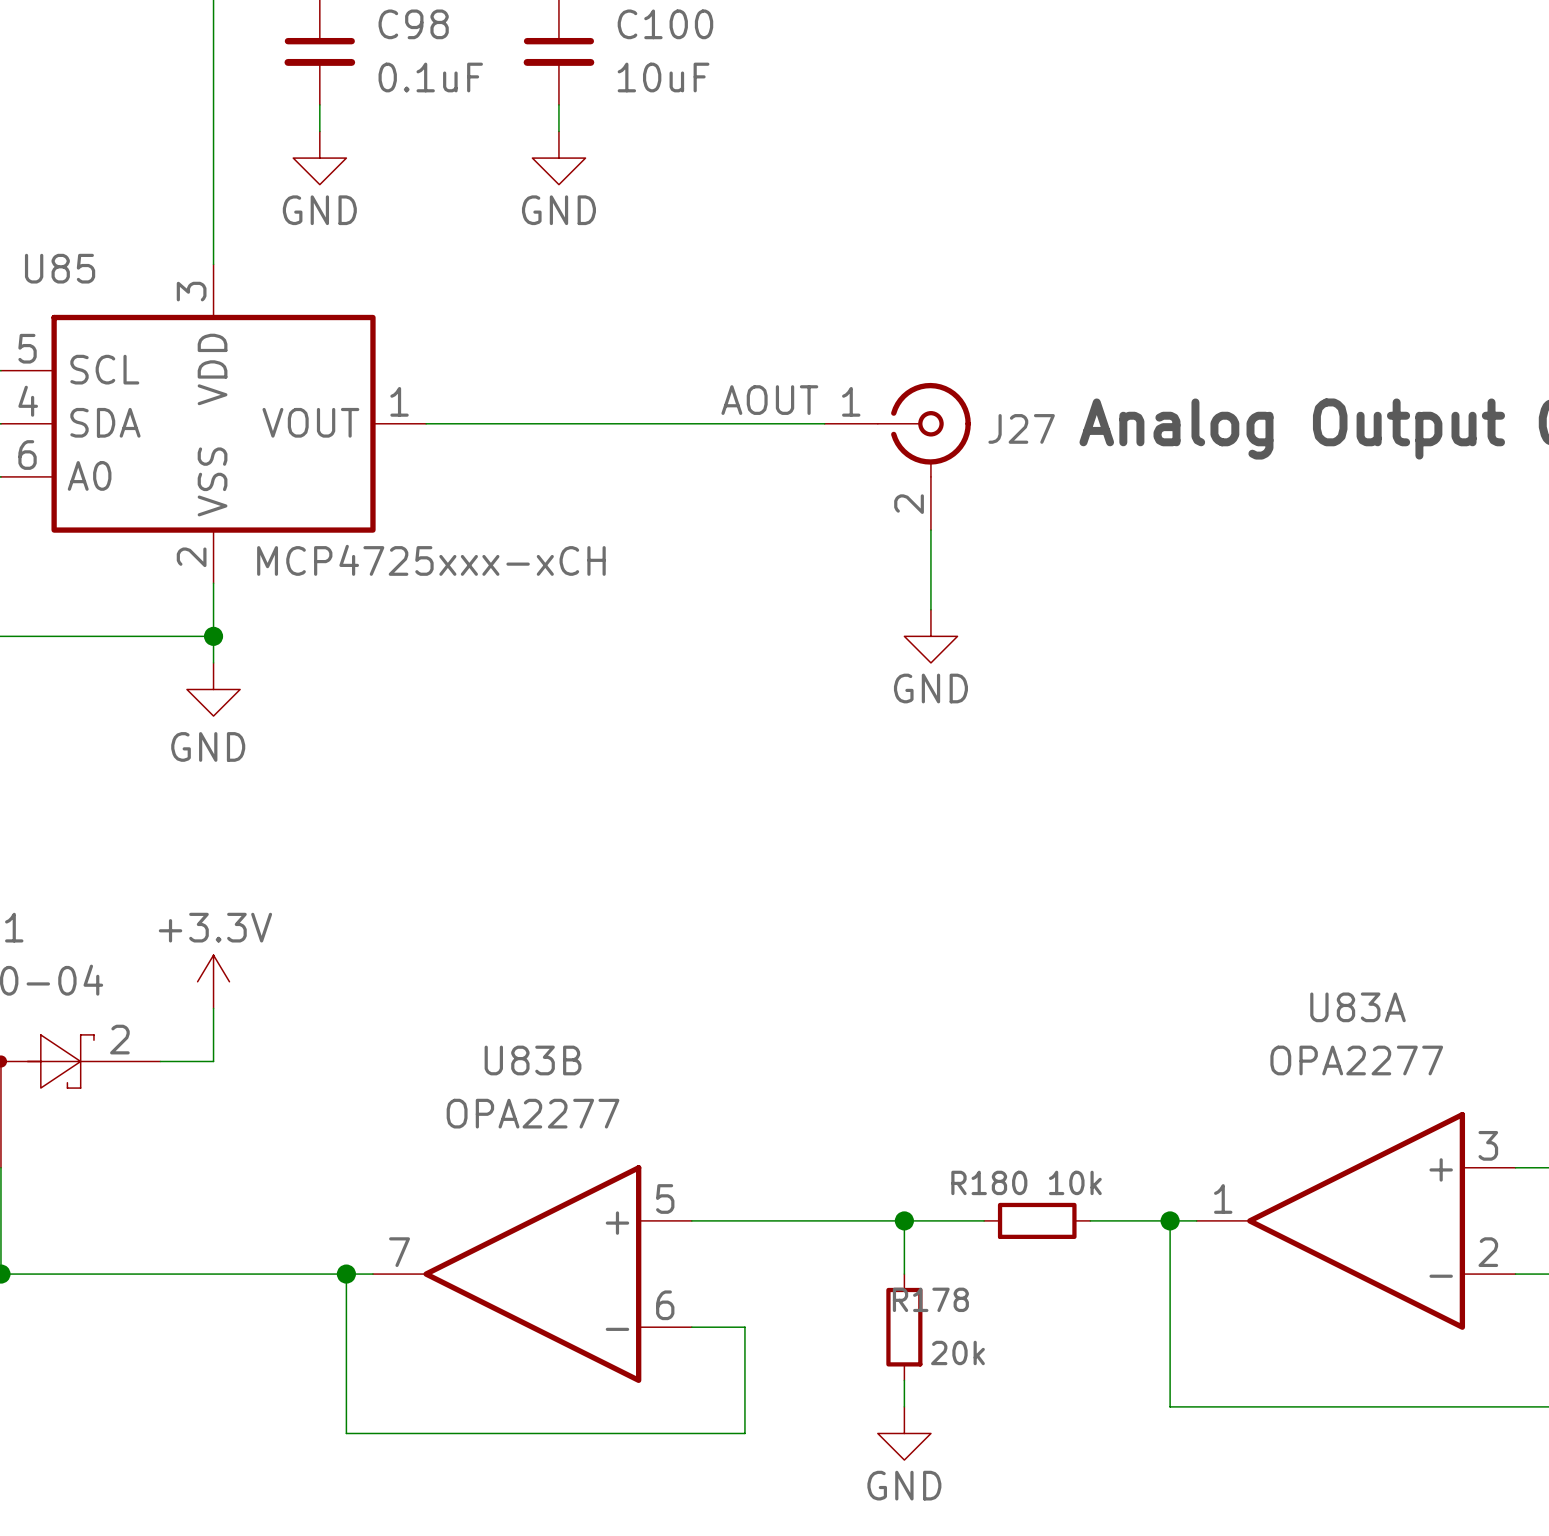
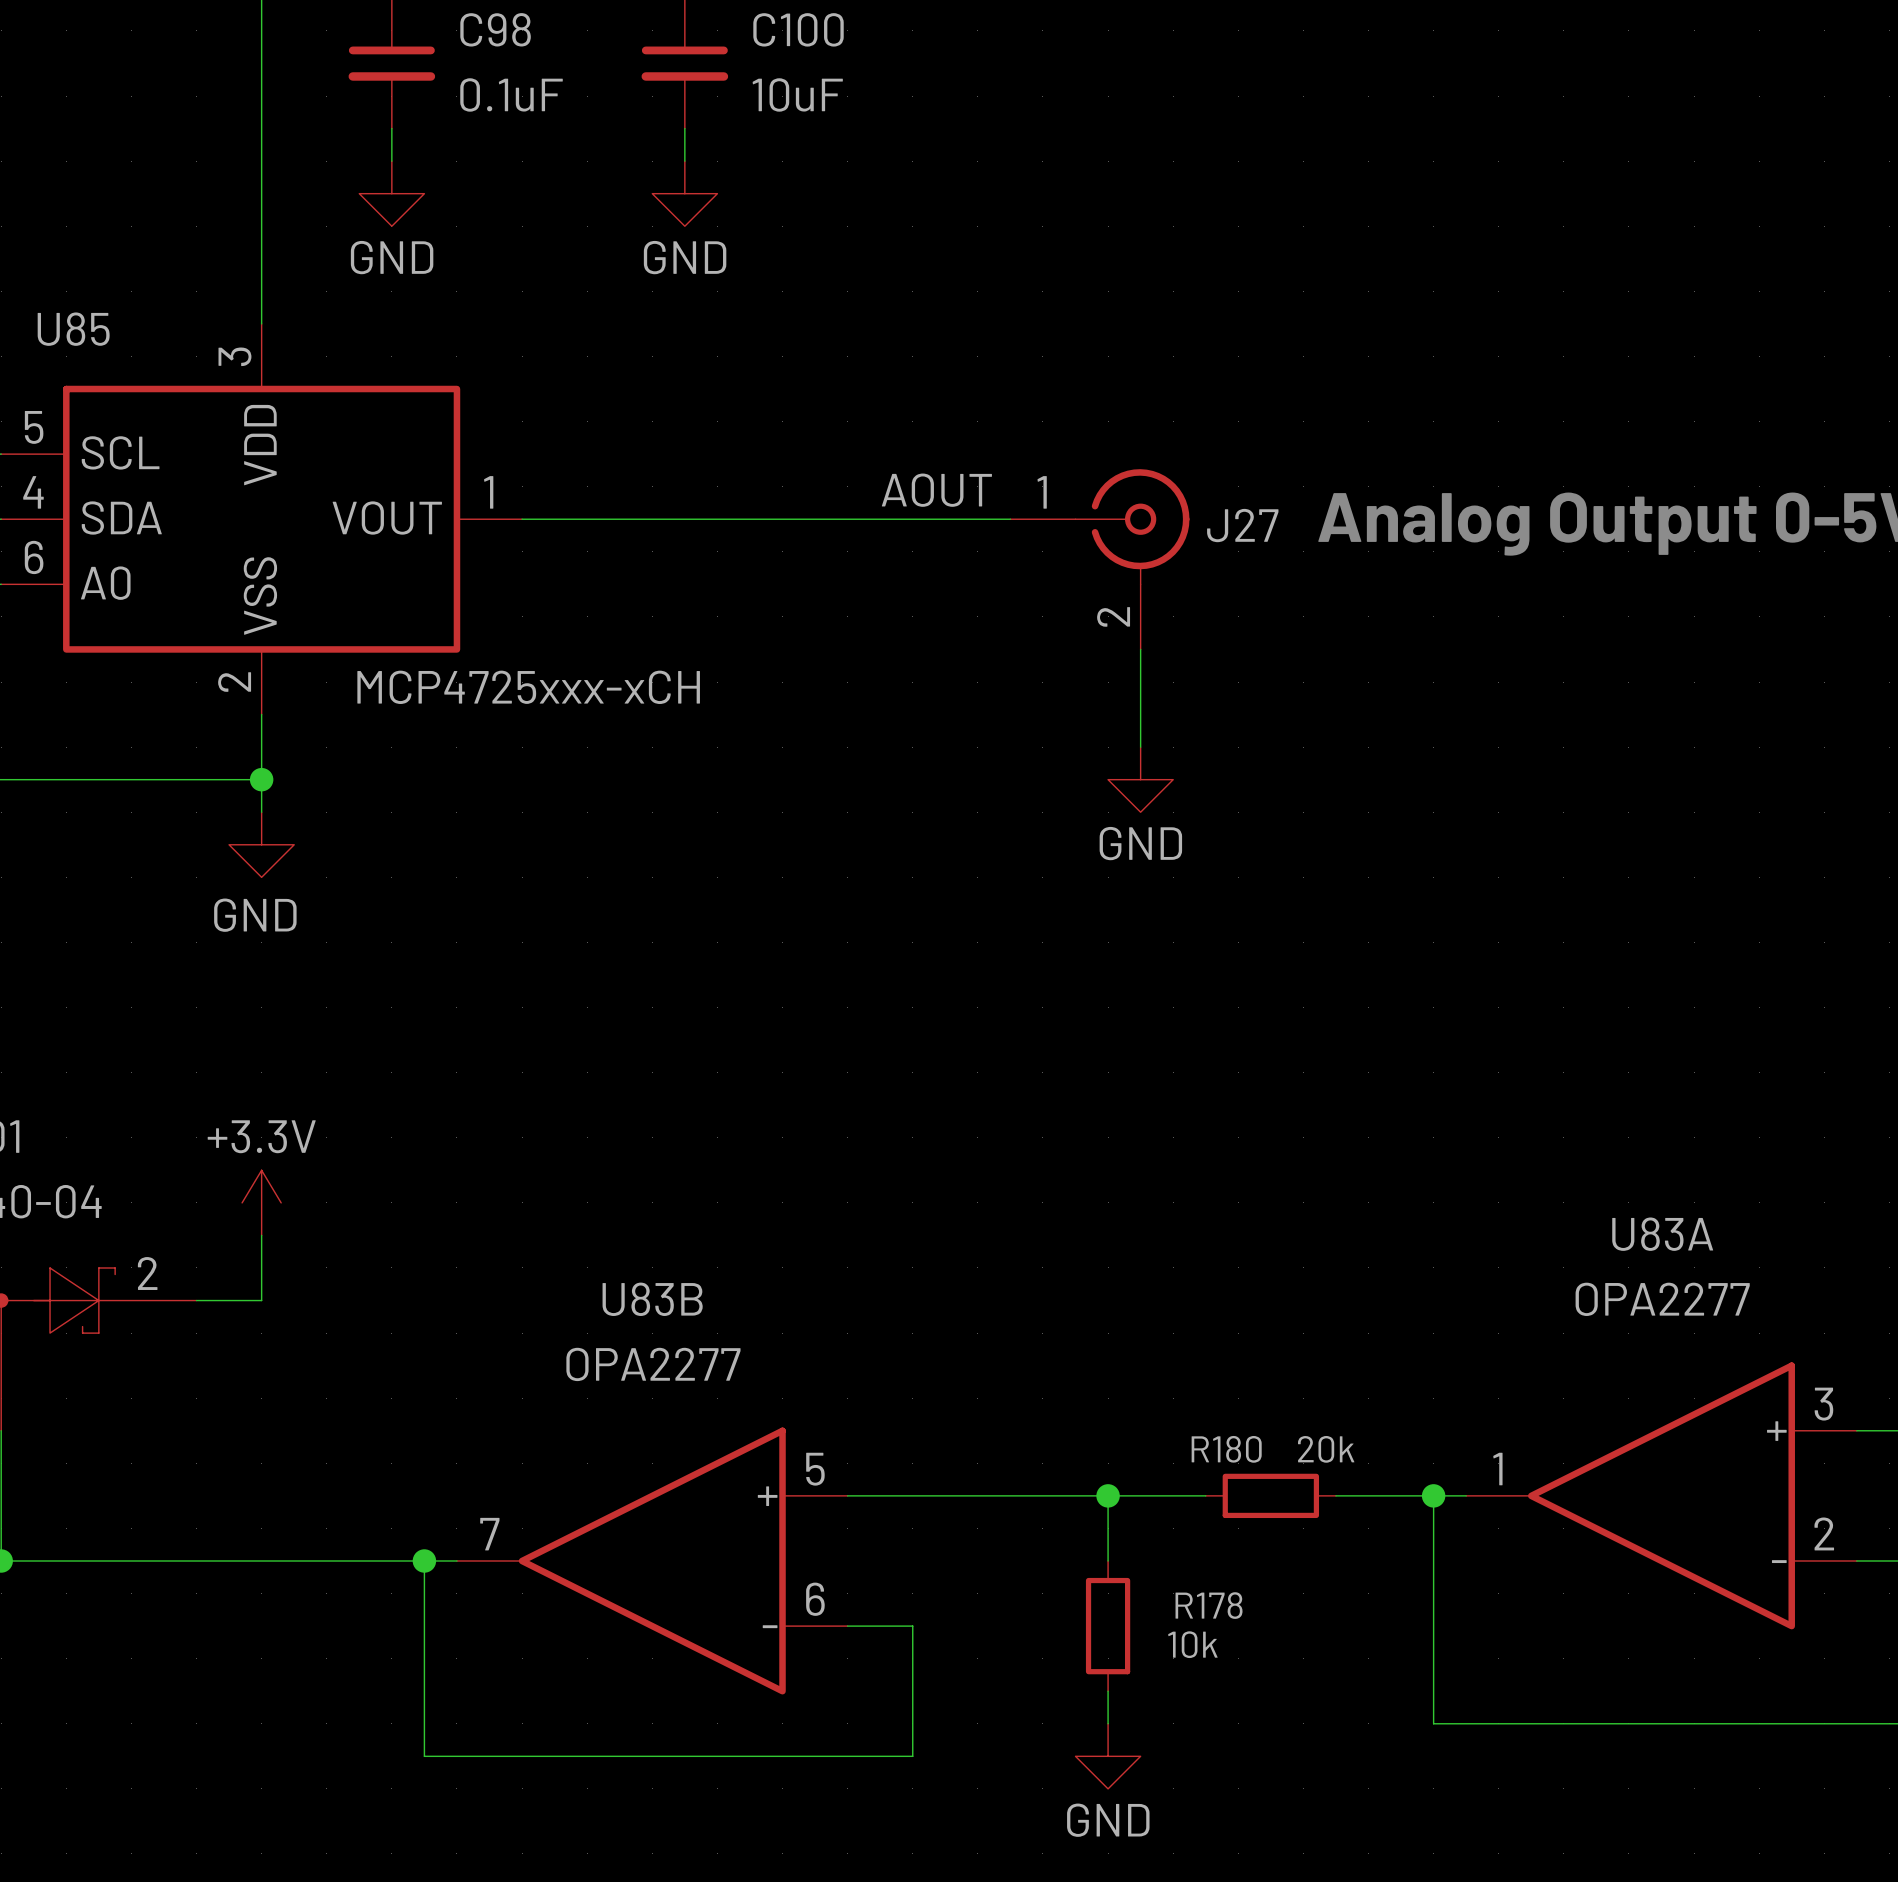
R180 value: 10k (1075, 1182) -> 20k (1326, 1449)
R178 name position: R178 (930, 1299) -> R178 (1209, 1605)
R178 value: 20k (957, 1352) -> 10k (1192, 1644)

